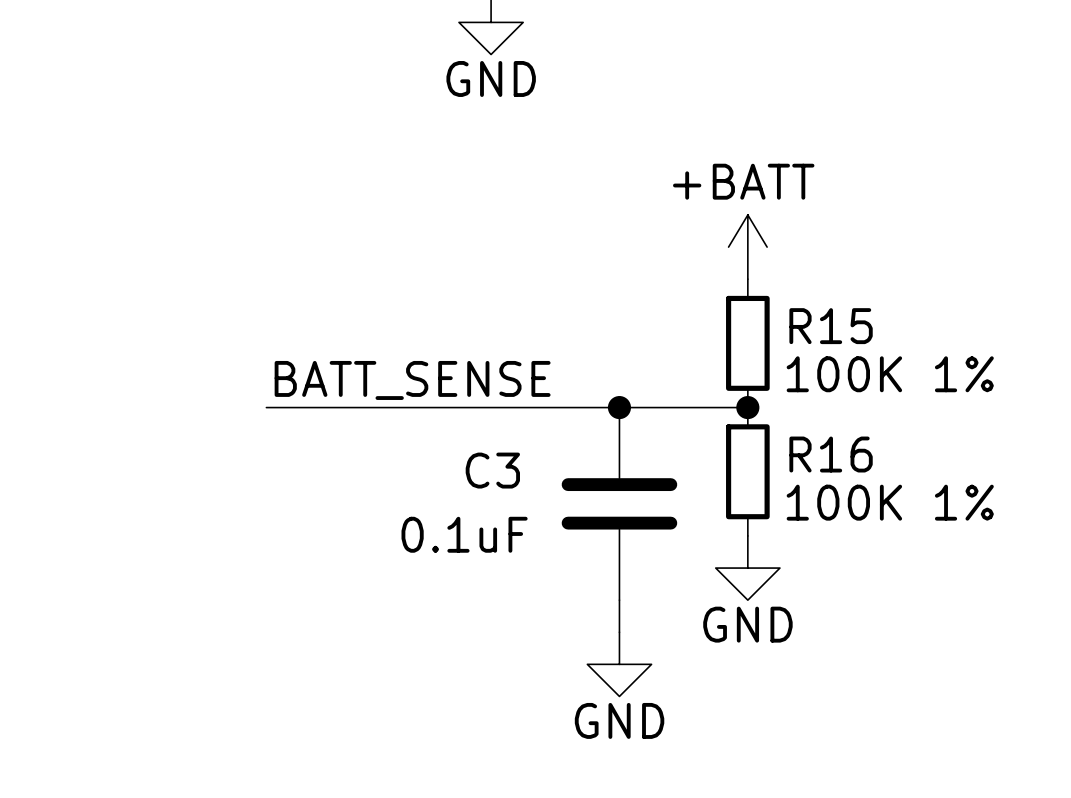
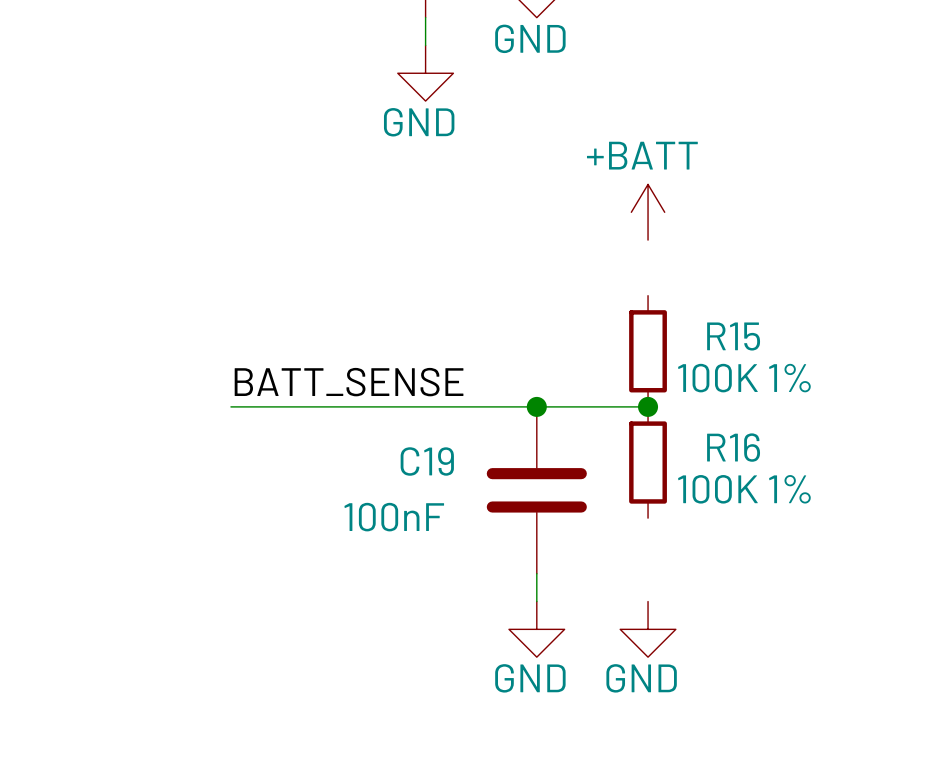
power symbol position: +BATT (747, 247) -> +BATT (648, 212)
C3 name: C3 (492, 470) -> C19 (427, 461)
C3 value: 0.1uF (464, 534) -> 100nF (394, 517)
power symbol position: GND (747, 568) -> GND (648, 629)

